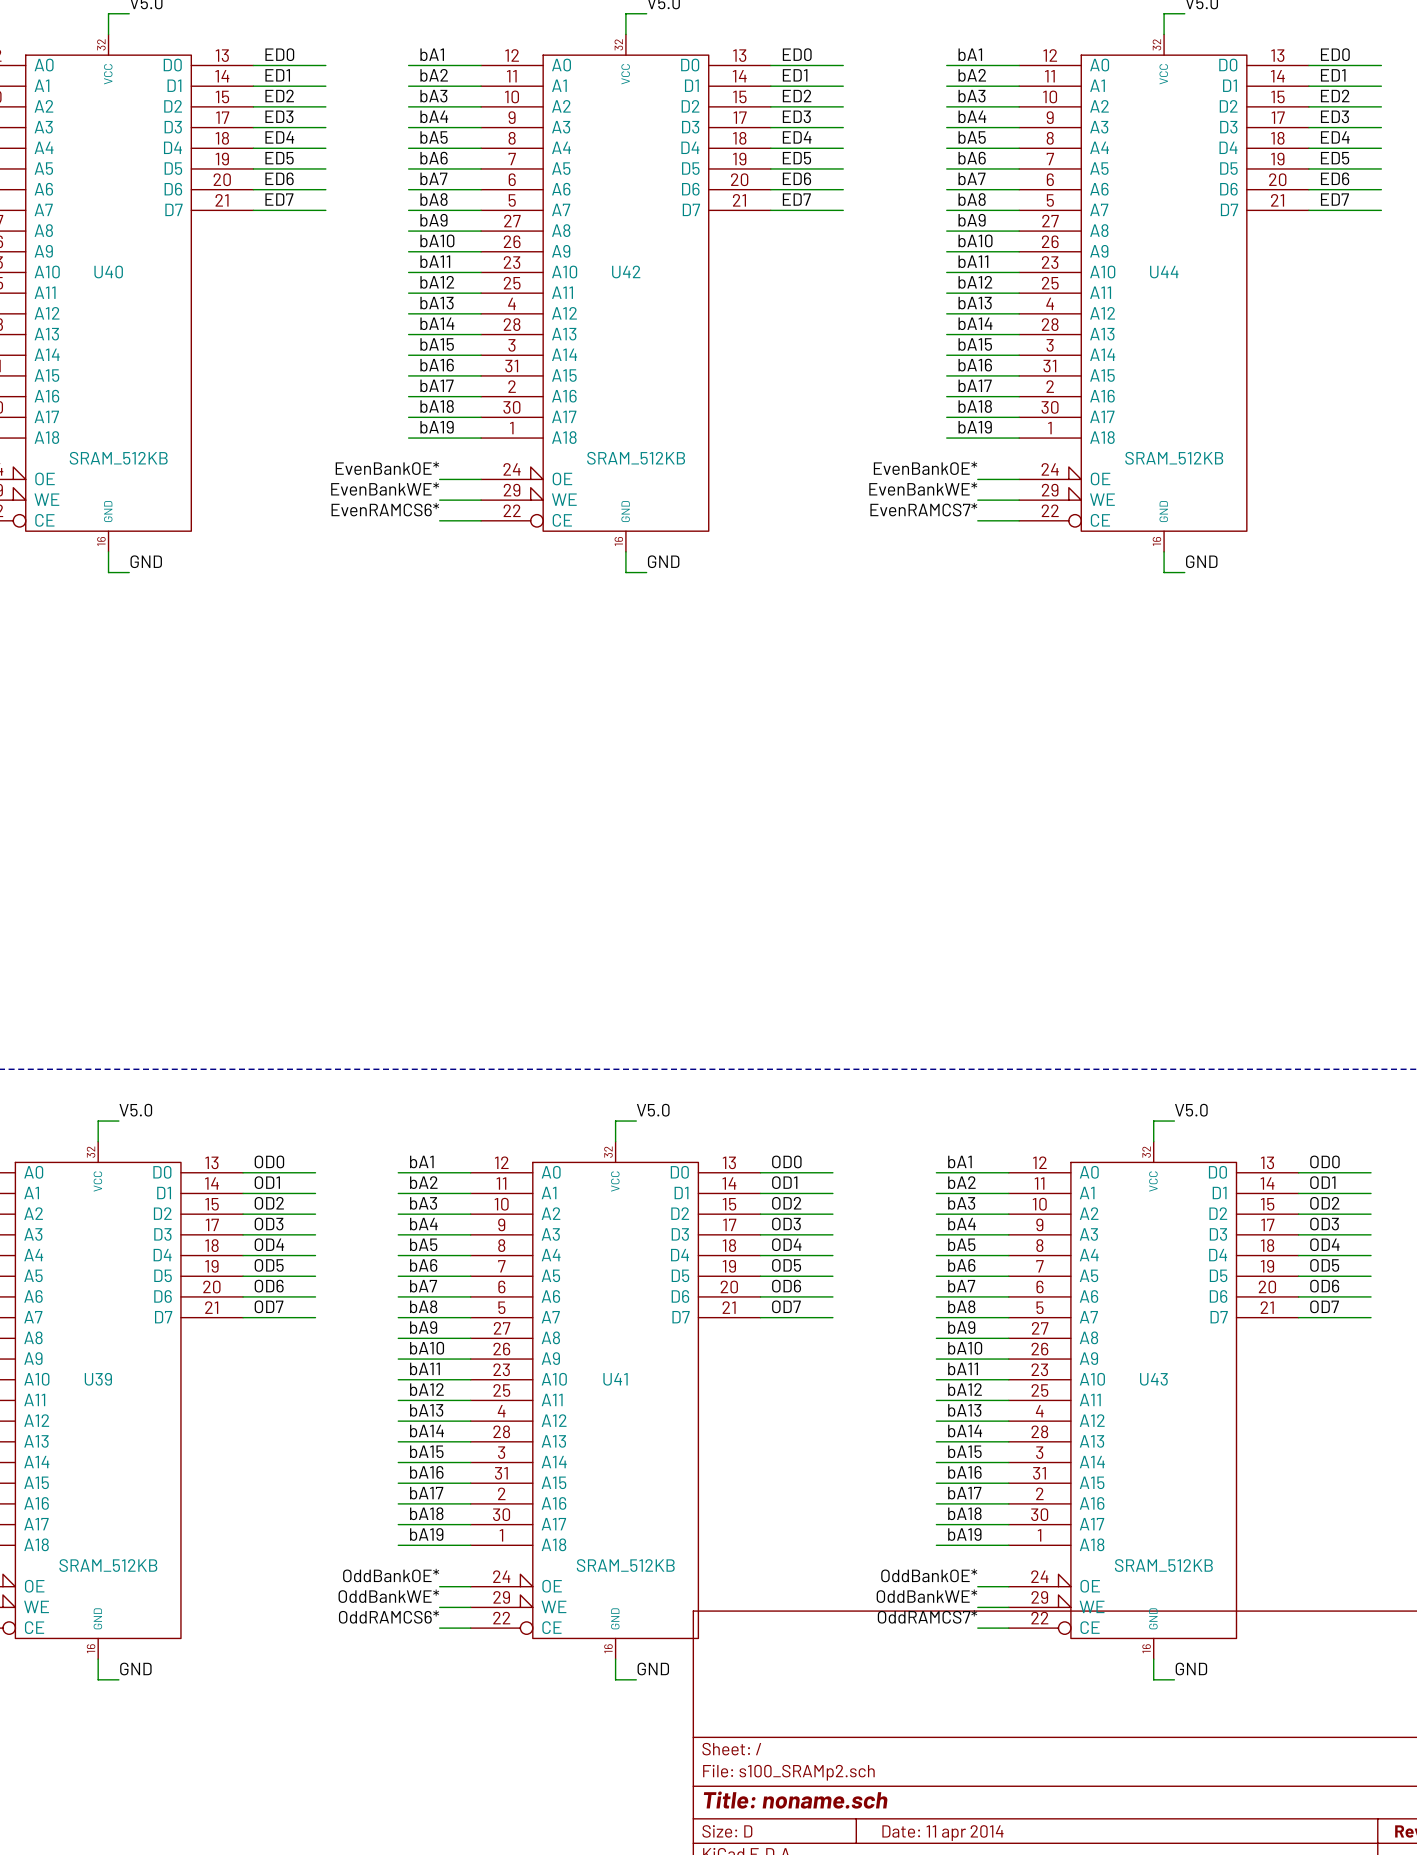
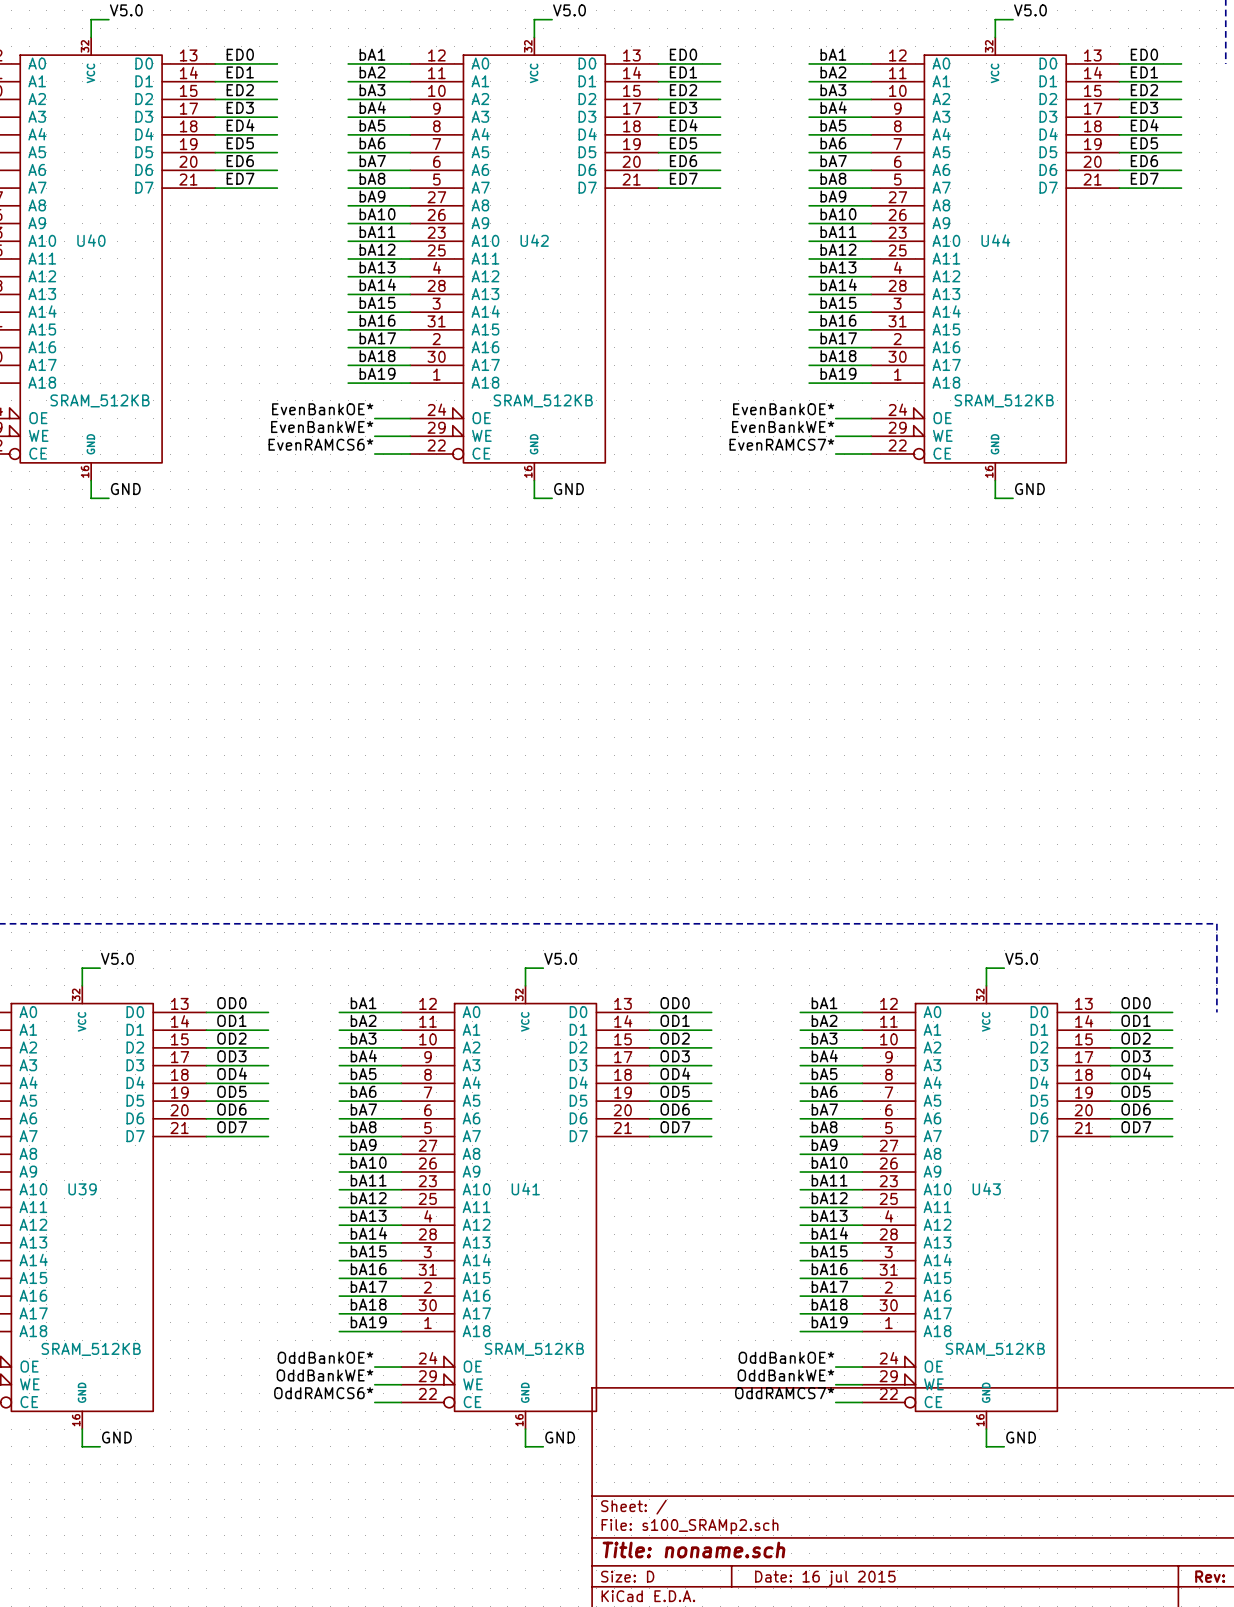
title block: Date: 11 apr 2014 (942, 1833) -> Date: 16 jul 2015 (825, 1578)

